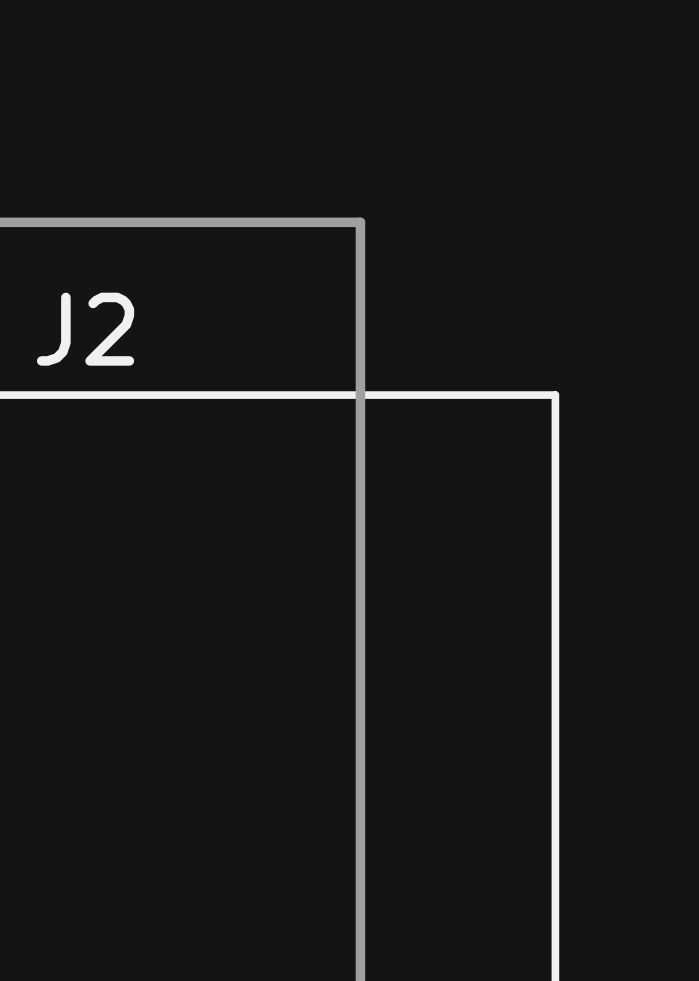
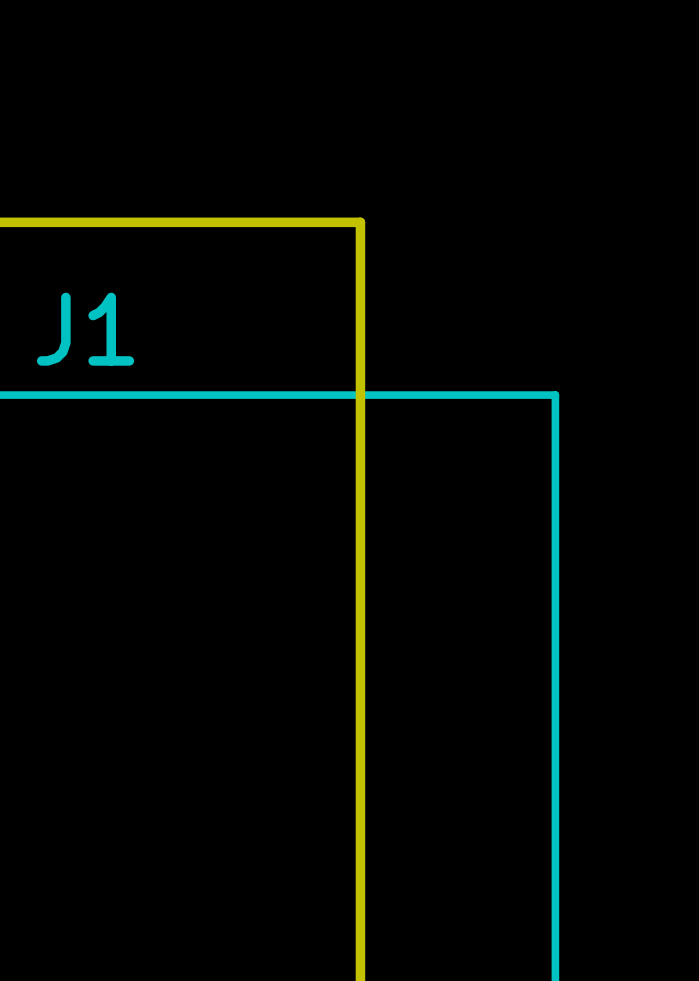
J2 name: J2 (85, 329) -> J1 (85, 329)

